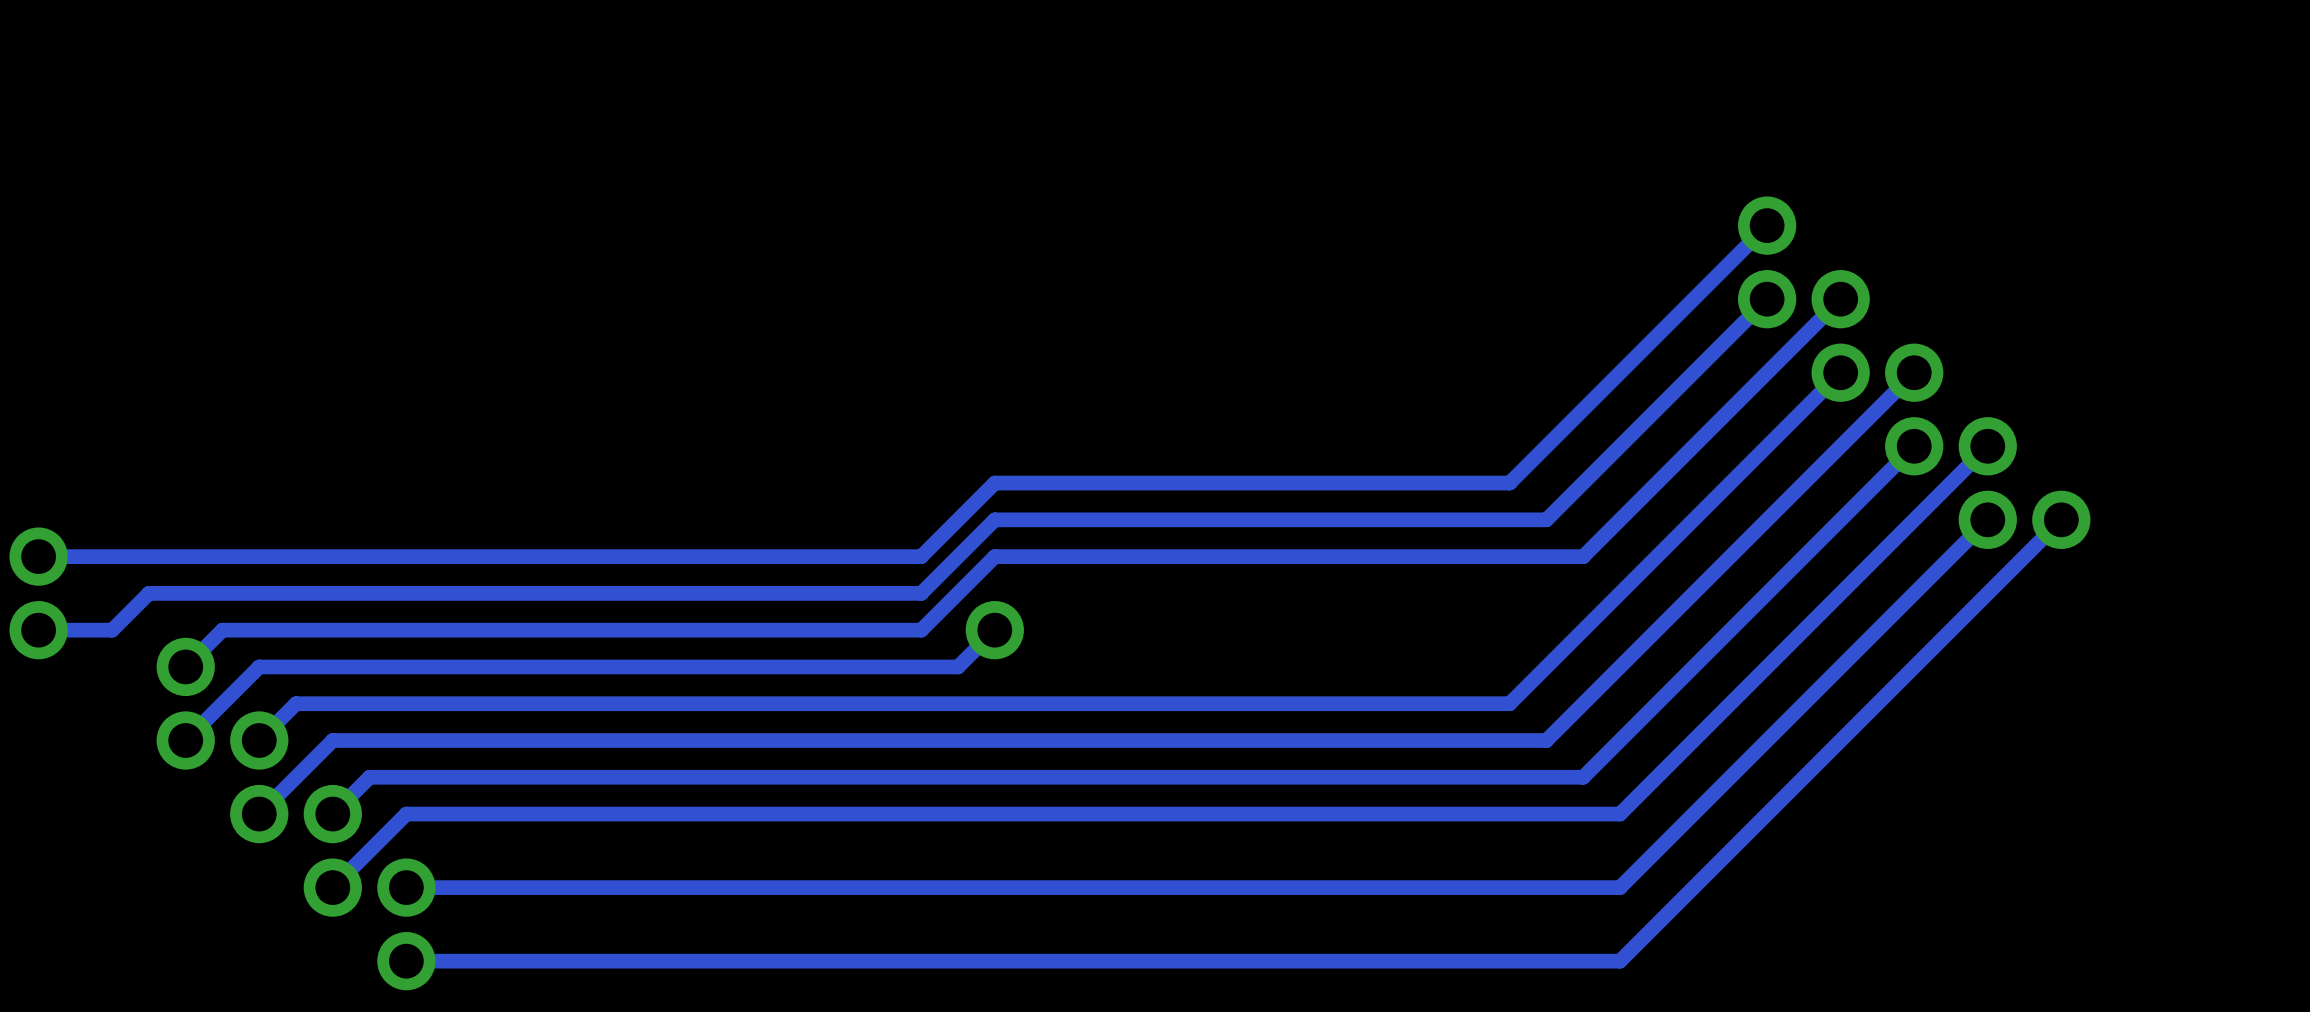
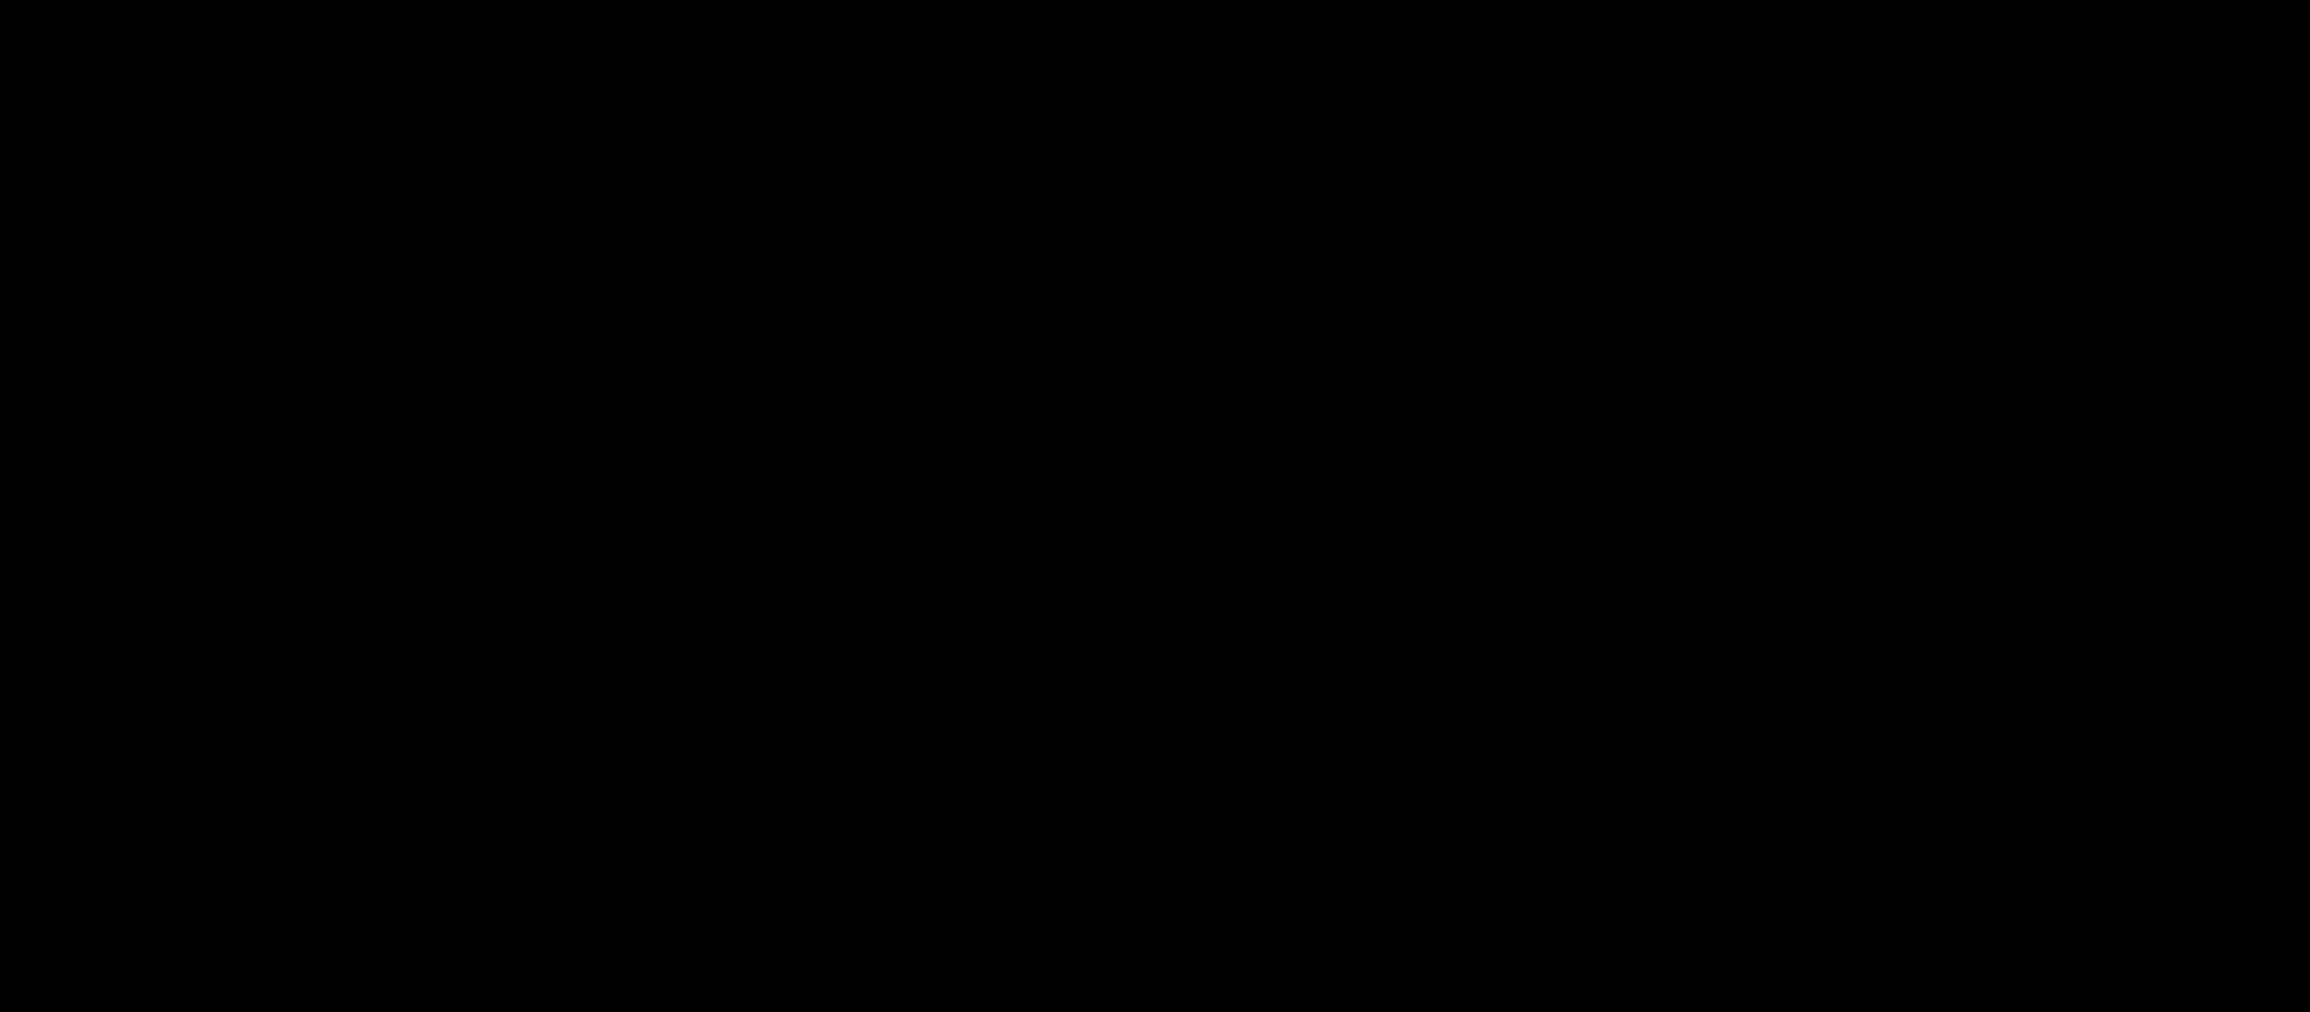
track: (1767, 225) (1509, 483) (994, 483) (921, 556) (38, 556) -> none
via: (1767, 225) -> none
track: (1767, 299) (1546, 519) (994, 519) (921, 593) (148, 593) (112, 630) (38, 630) -> none
via: (1767, 299) -> none
track: (1840, 299) (1583, 556) (994, 556) (921, 630) (222, 630) (185, 666) -> none
via: (1840, 299) -> none
track: (1840, 372) (1509, 703) (296, 703) (259, 740) -> none
via: (1840, 372) -> none
track: (1914, 372) (1546, 740) (332, 740) (259, 814) -> none
via: (1914, 372) -> none
track: (1914, 446) (1583, 777) (369, 777) (332, 814) -> none
via: (1914, 446) -> none
track: (1987, 446) (1620, 814) (406, 814) (332, 887) -> none
via: (1987, 446) -> none
track: (1987, 519) (1620, 887) (406, 887) -> none
via: (1987, 519) -> none
track: (2061, 519) (1620, 961) (406, 961) -> none
via: (2061, 519) -> none
via: (38, 556) -> none
via: (38, 630) -> none
track: (994, 630) (958, 666) (259, 666) (185, 740) -> none
via: (994, 630) -> none
via: (185, 666) -> none
via: (185, 740) -> none
via: (259, 740) -> none
via: (259, 814) -> none
via: (332, 814) -> none
via: (332, 887) -> none
via: (406, 887) -> none
via: (406, 961) -> none

